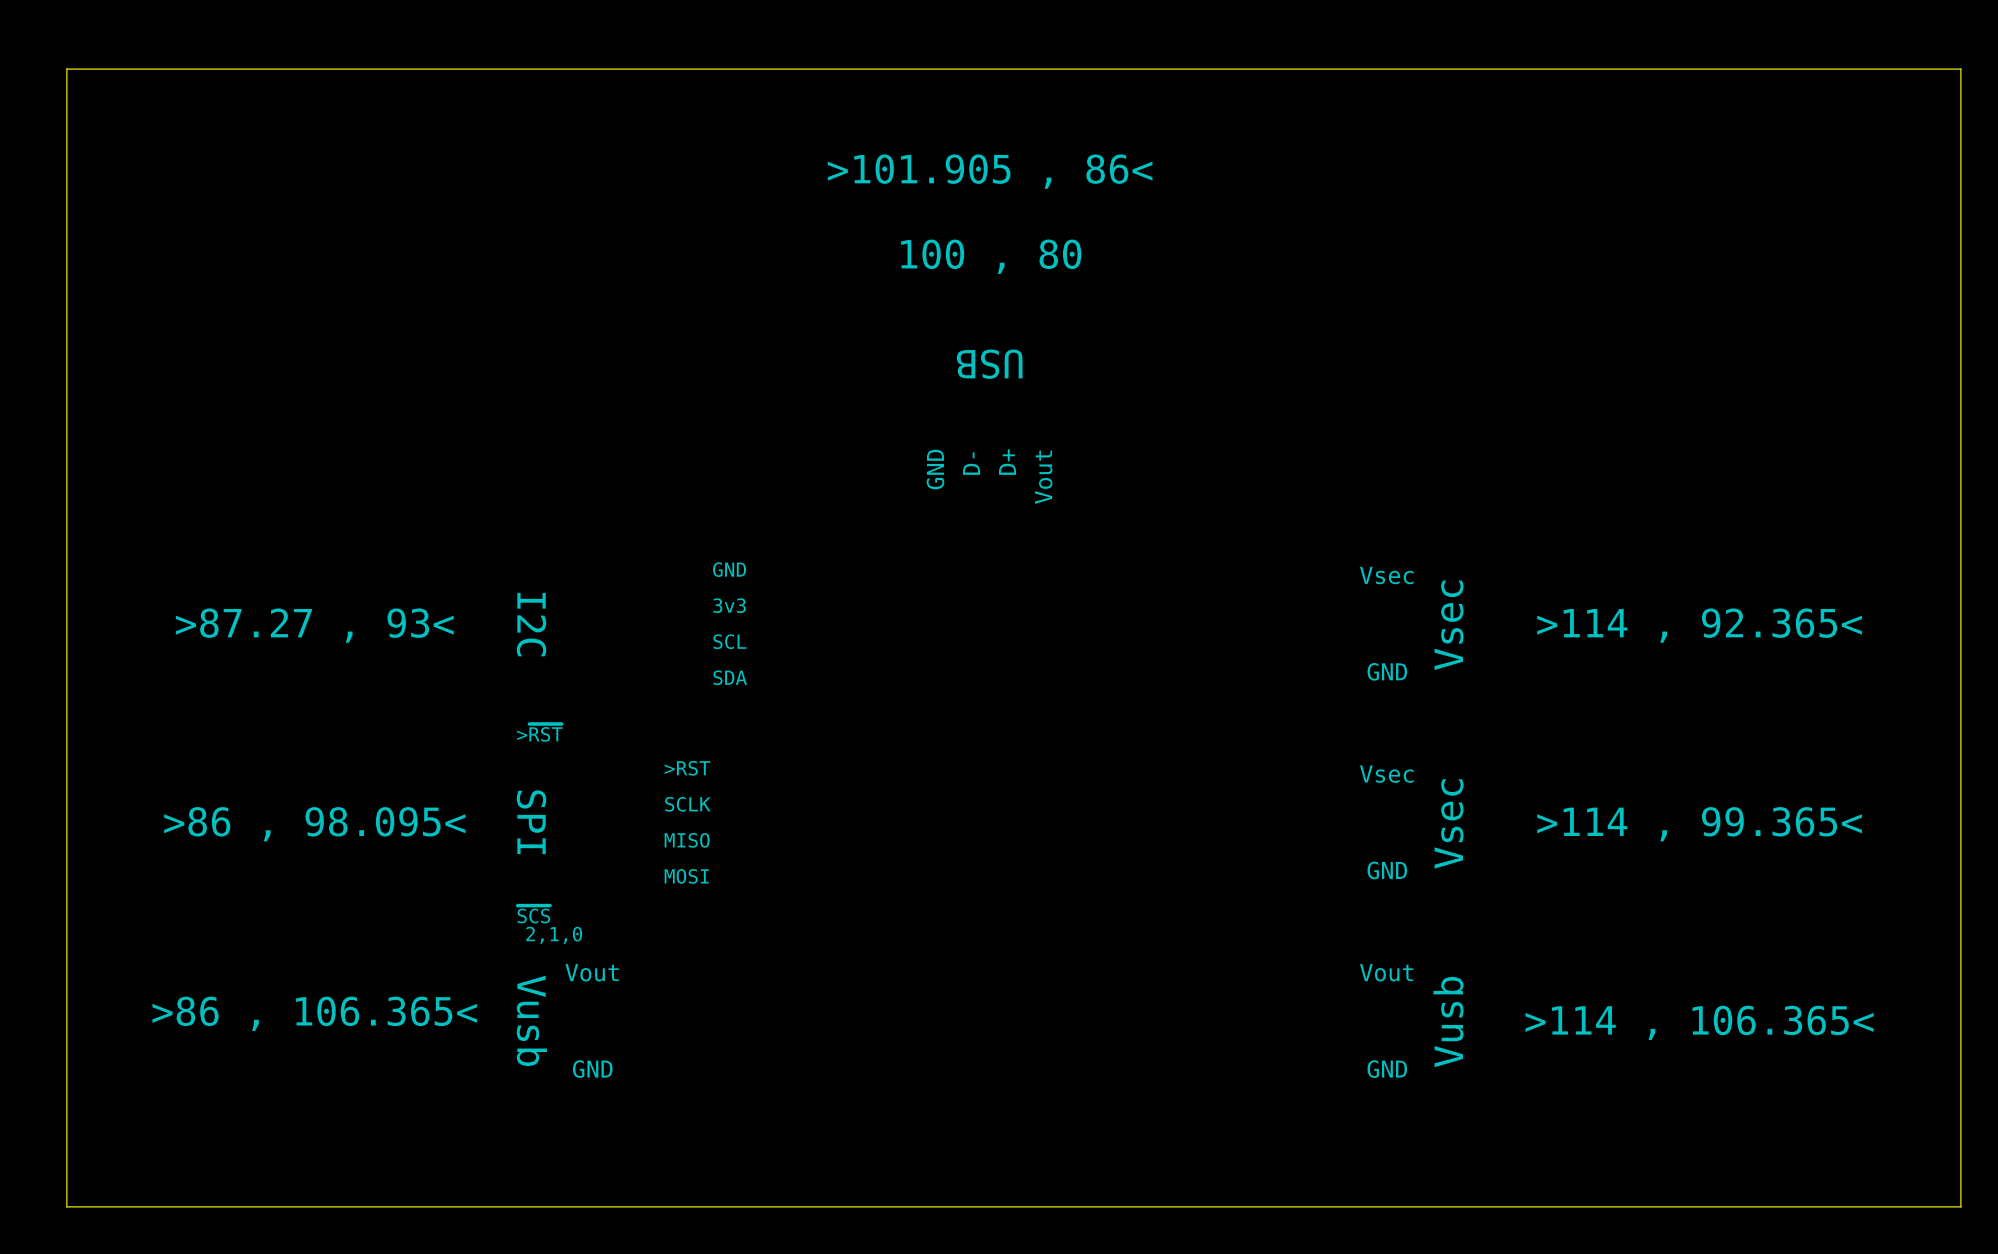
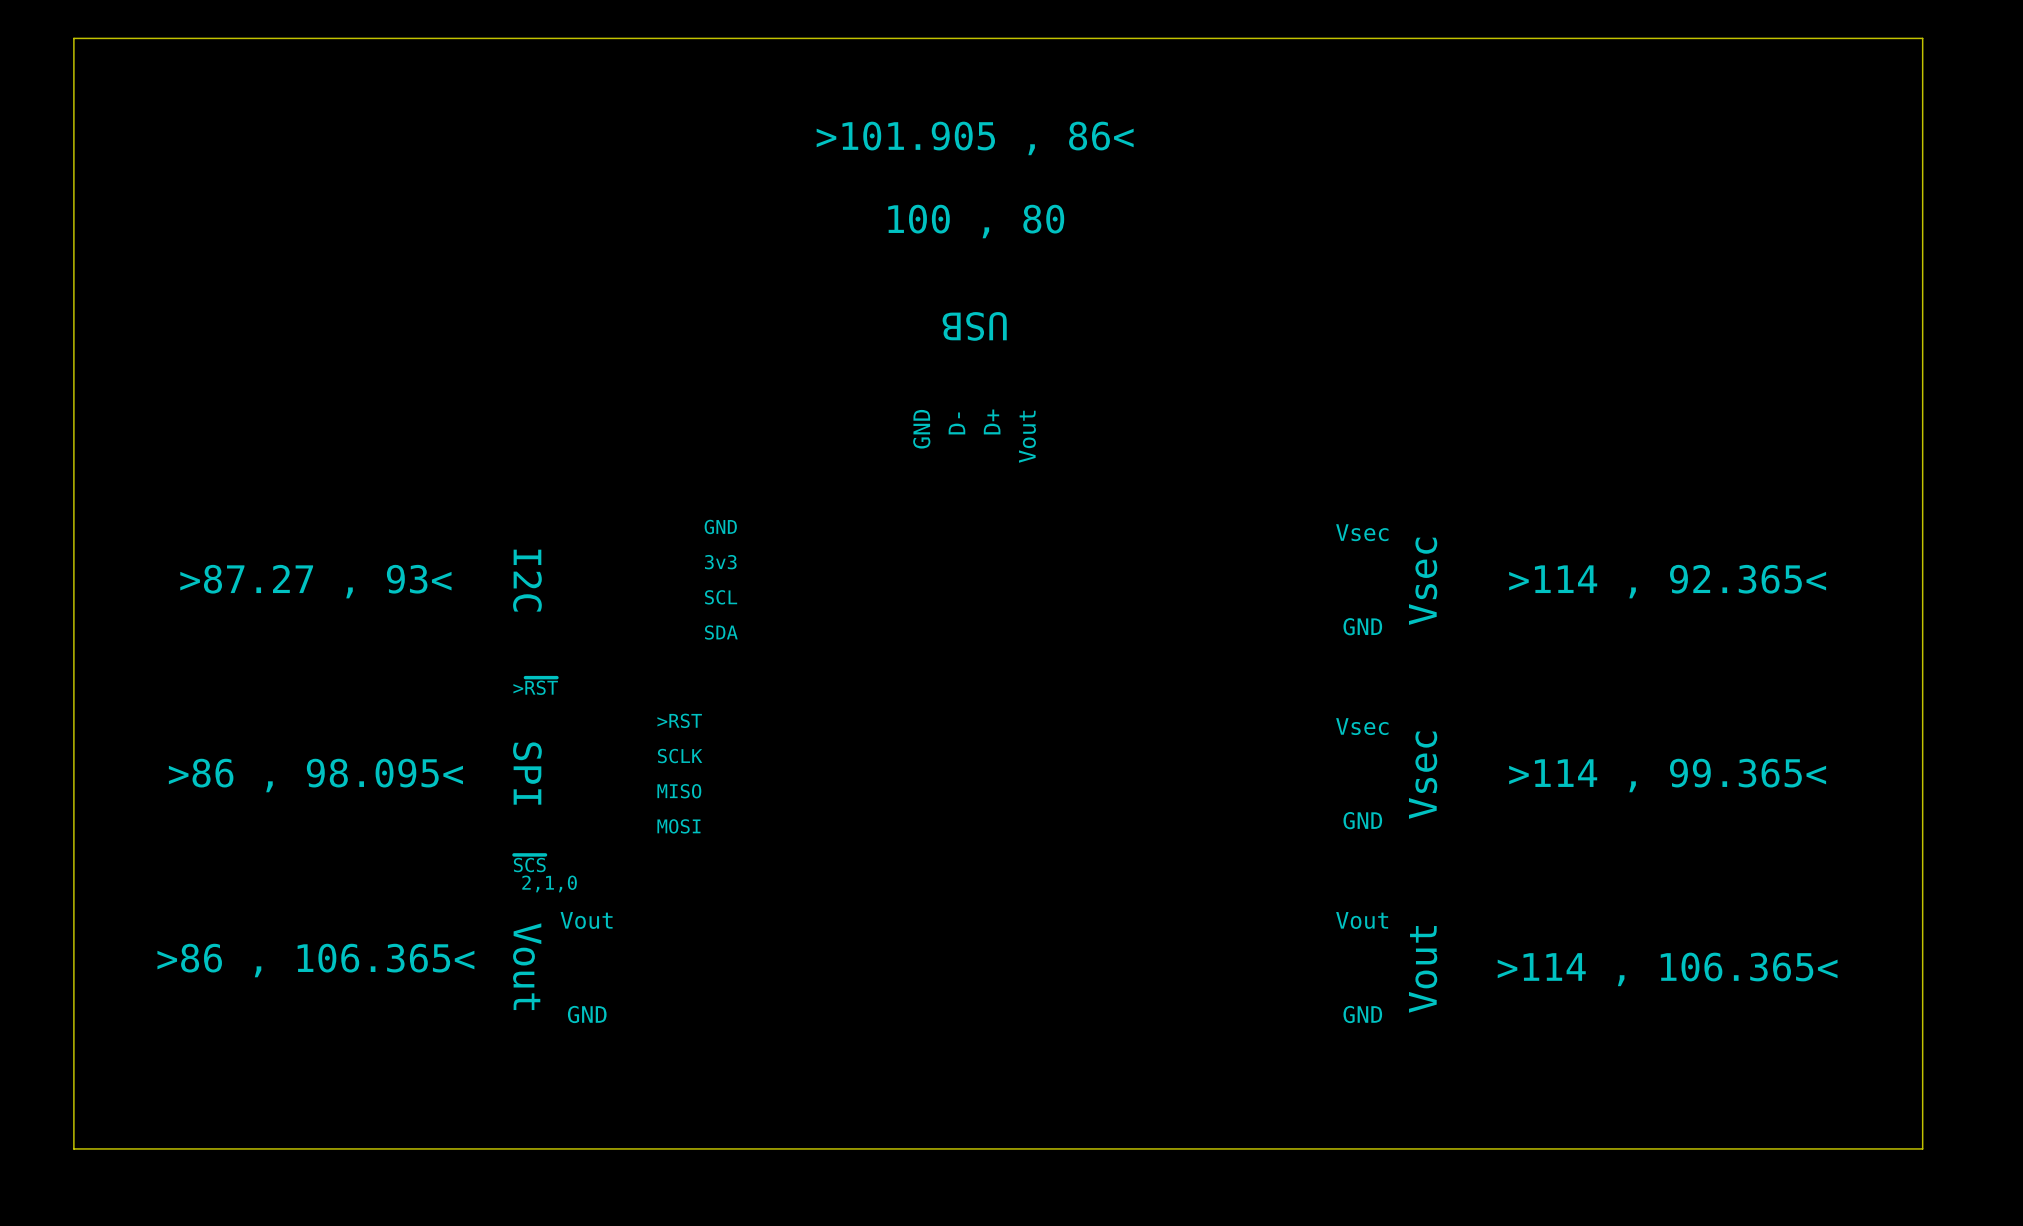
text: Vusb (531, 1020) -> Vout (527, 966)
text: Vusb (1448, 1022) -> Vout (1423, 969)

